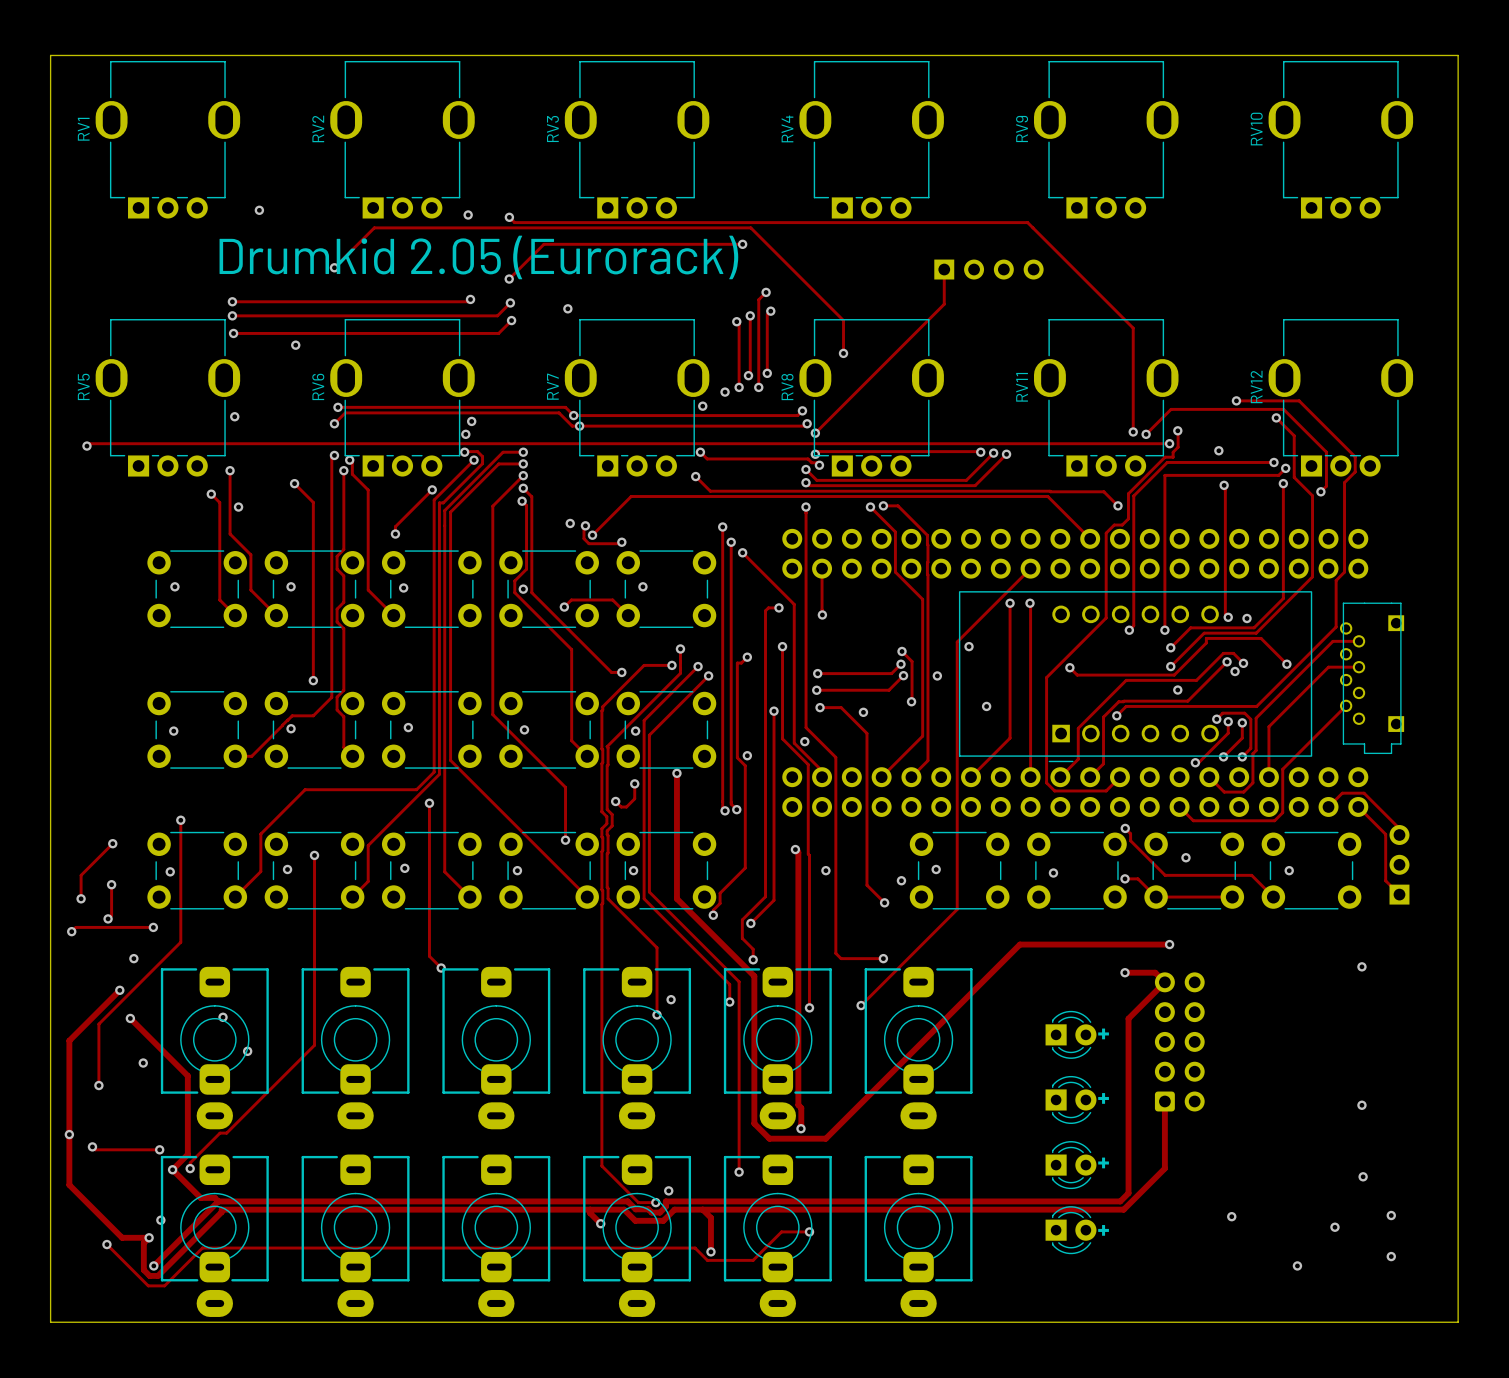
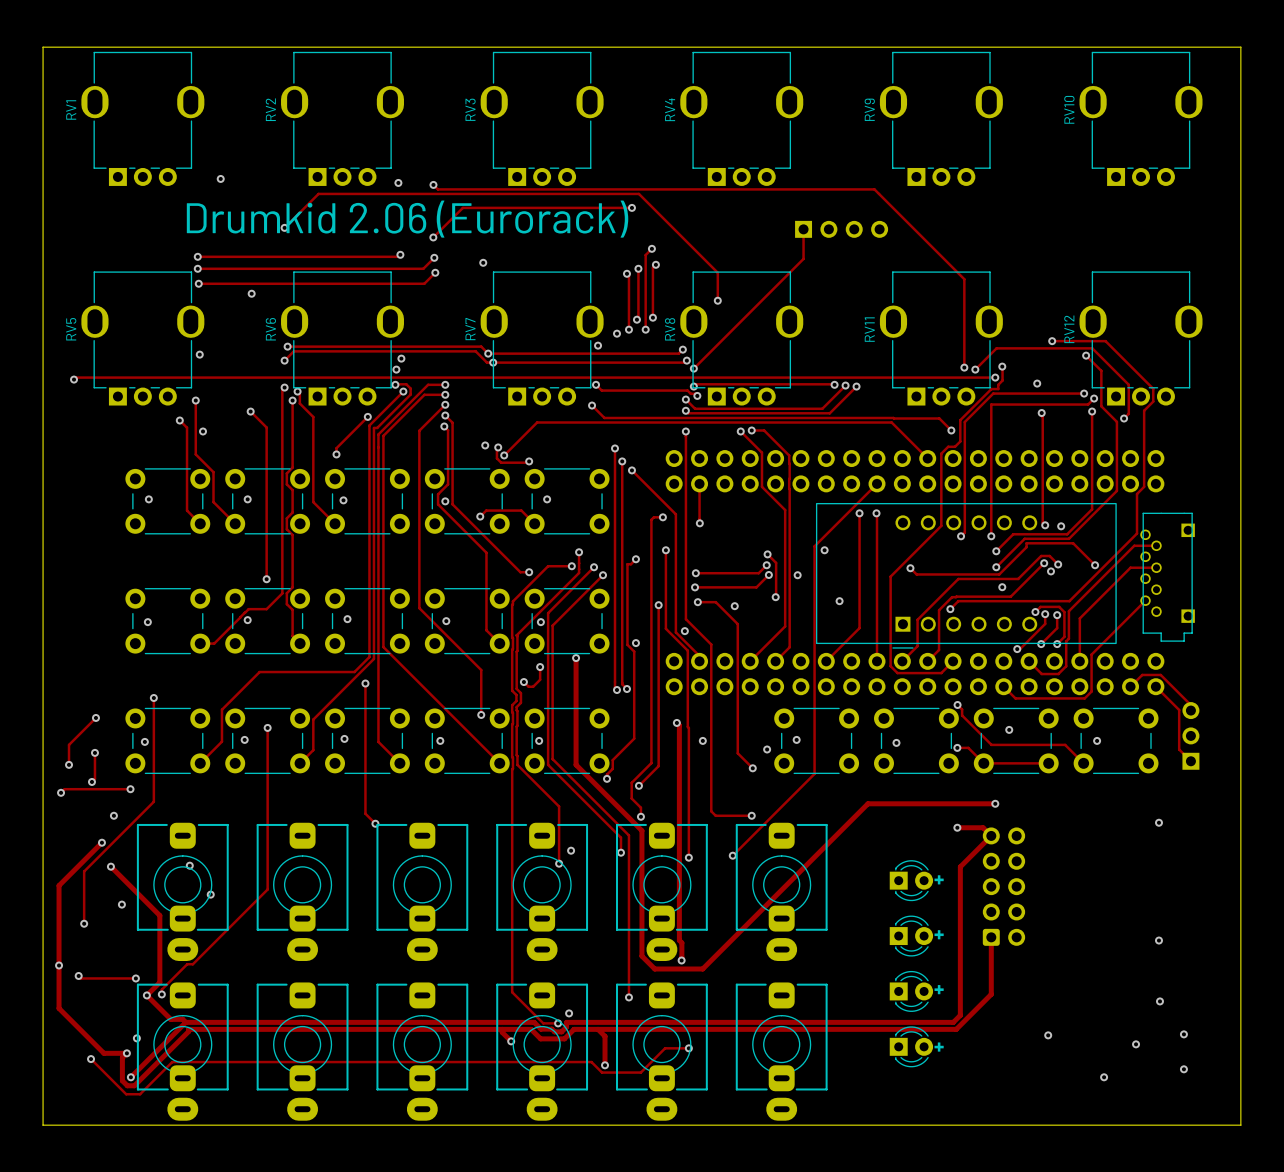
text: Drumkid 2.05 (Eurorack) (478, 257) -> Drumkid 2.06 (Eurorack) (407, 219)

